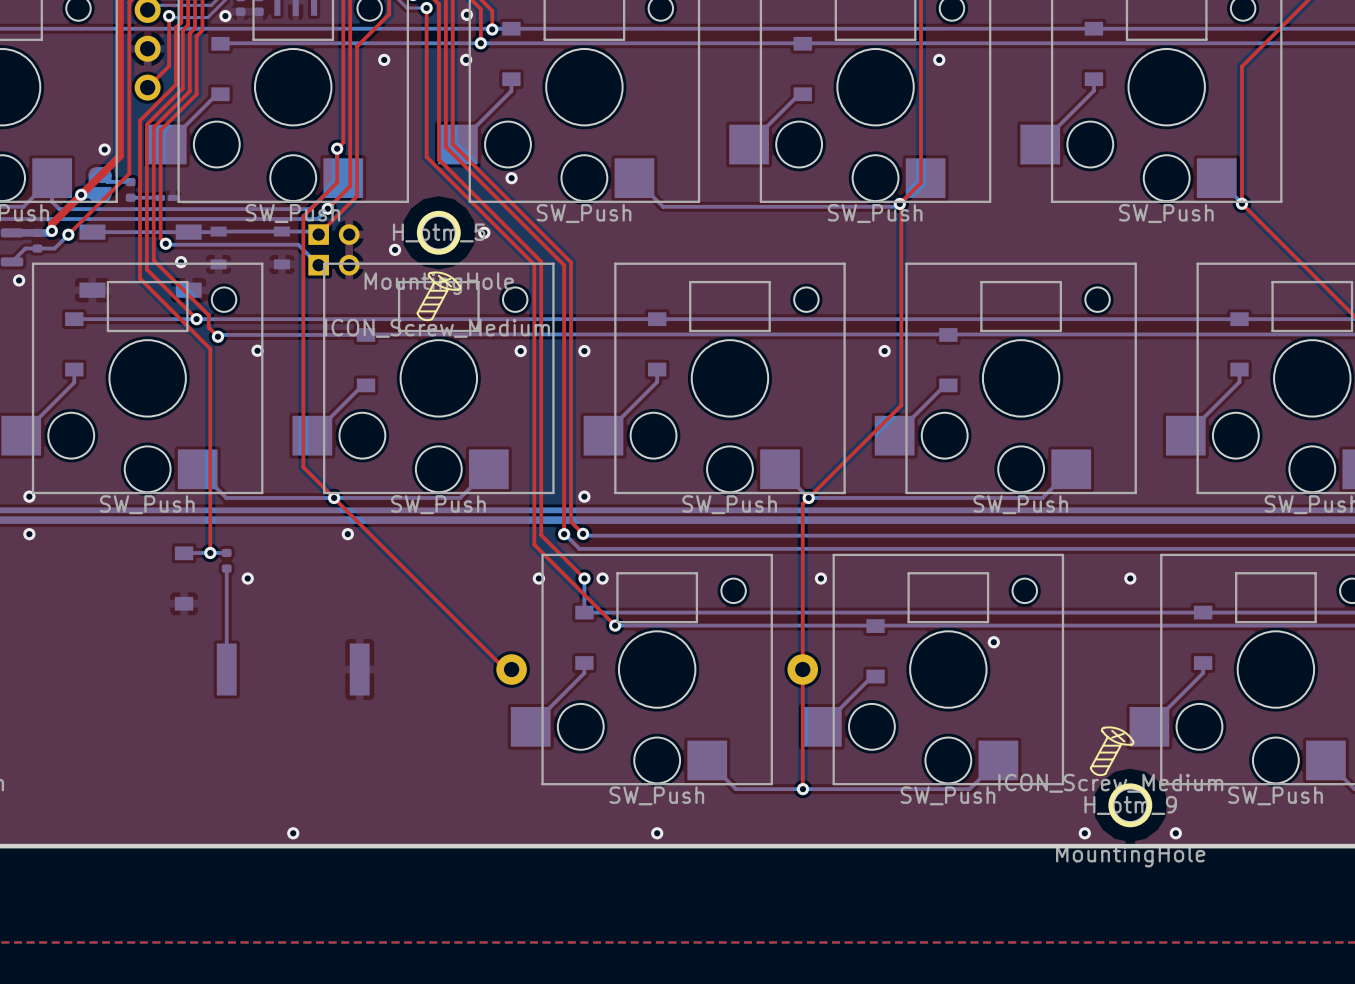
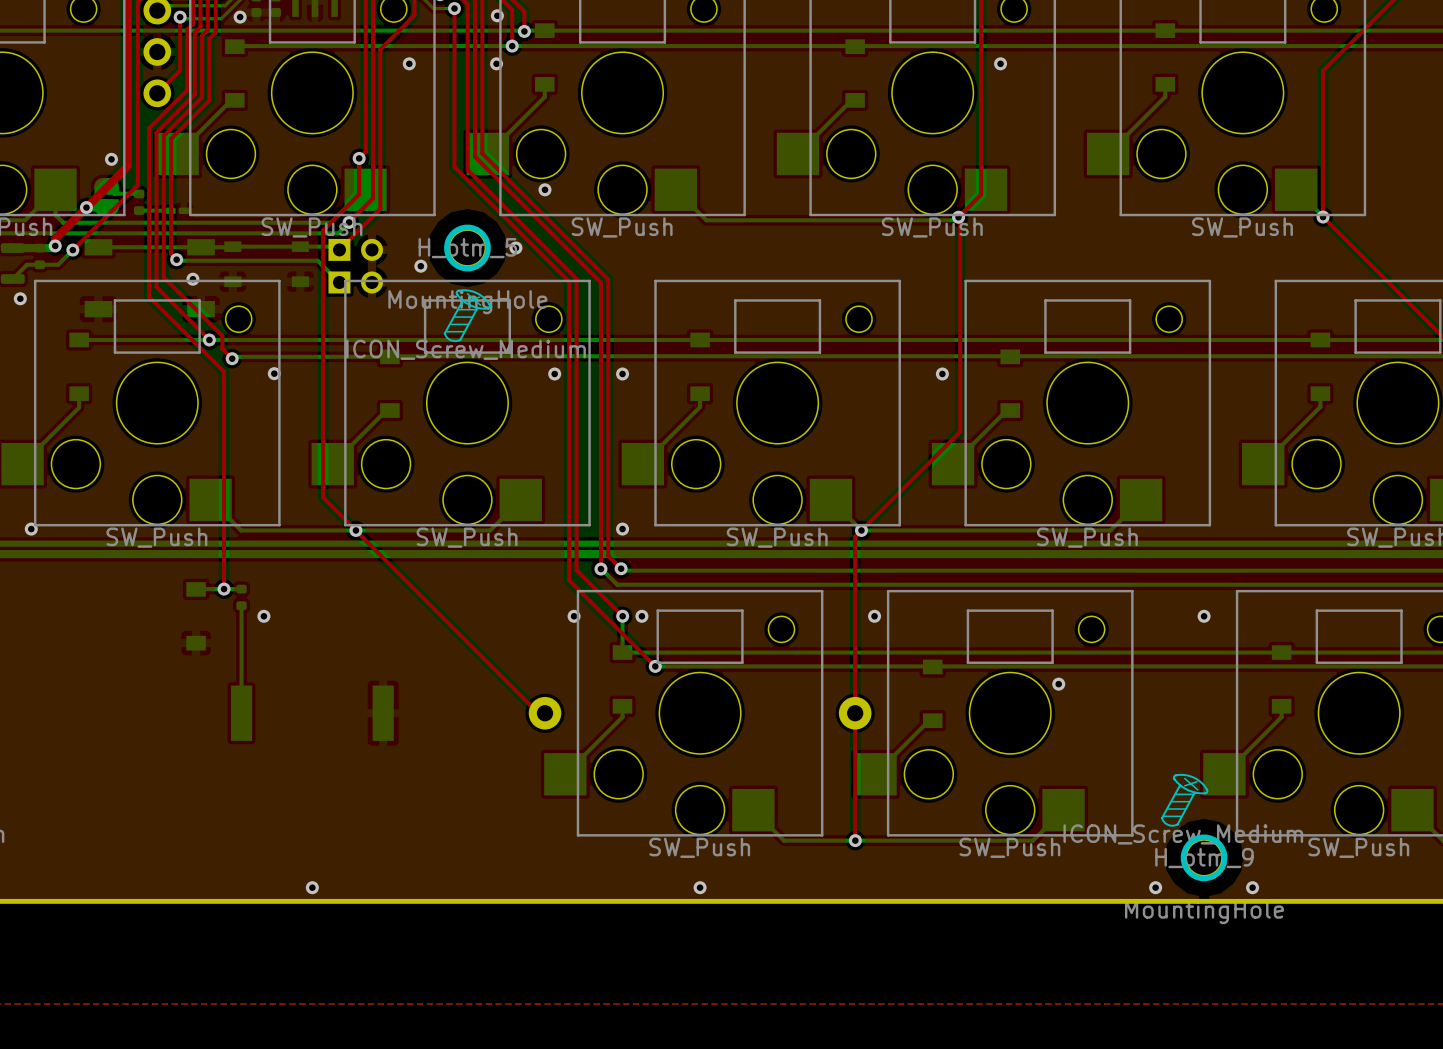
via: (29, 534) -> none
via: (347, 534) -> none

